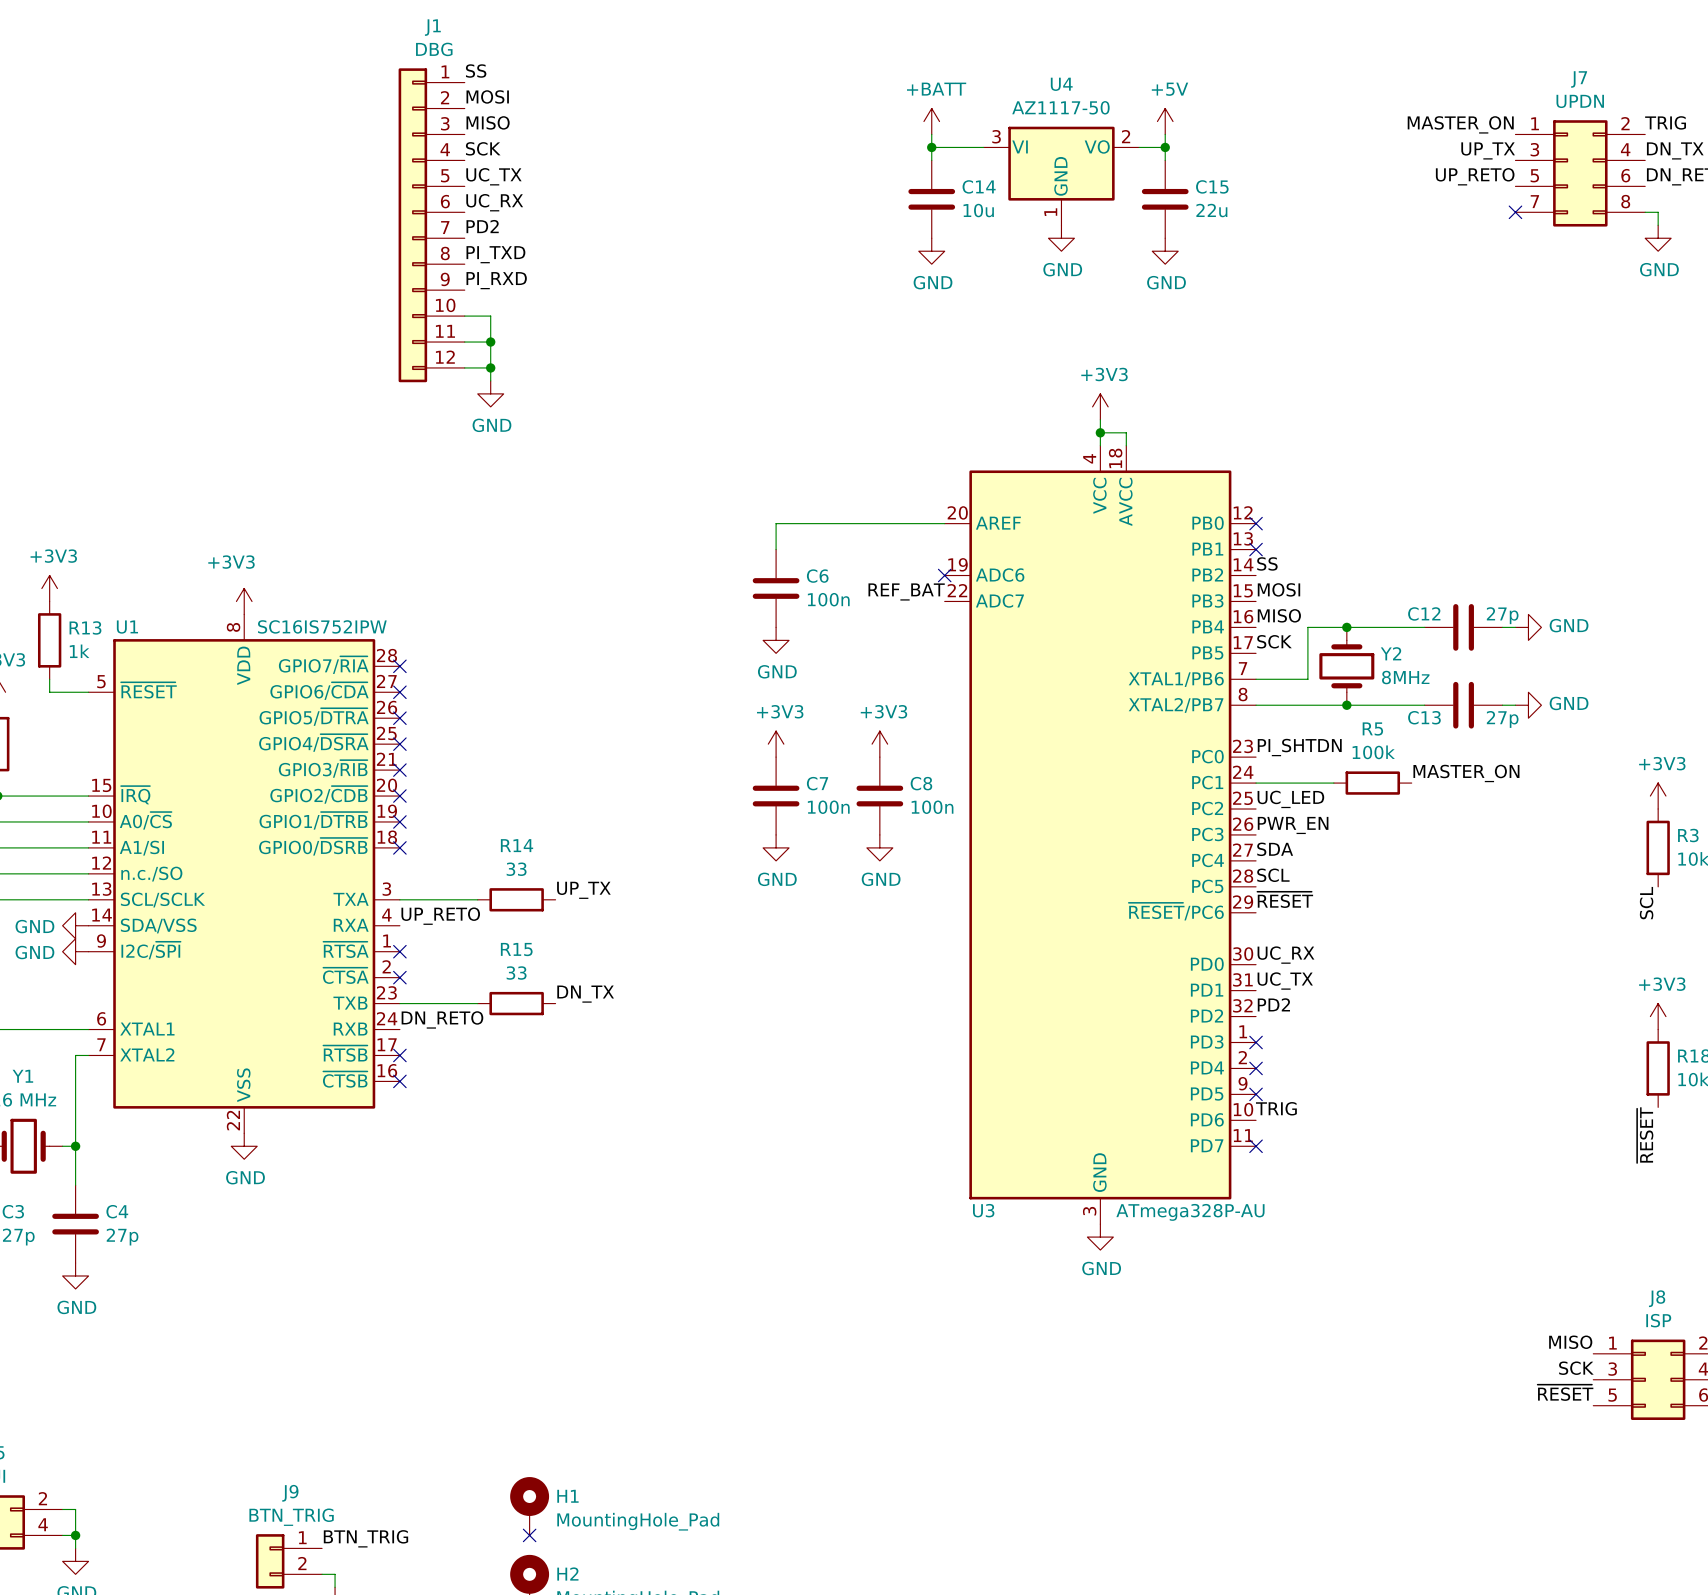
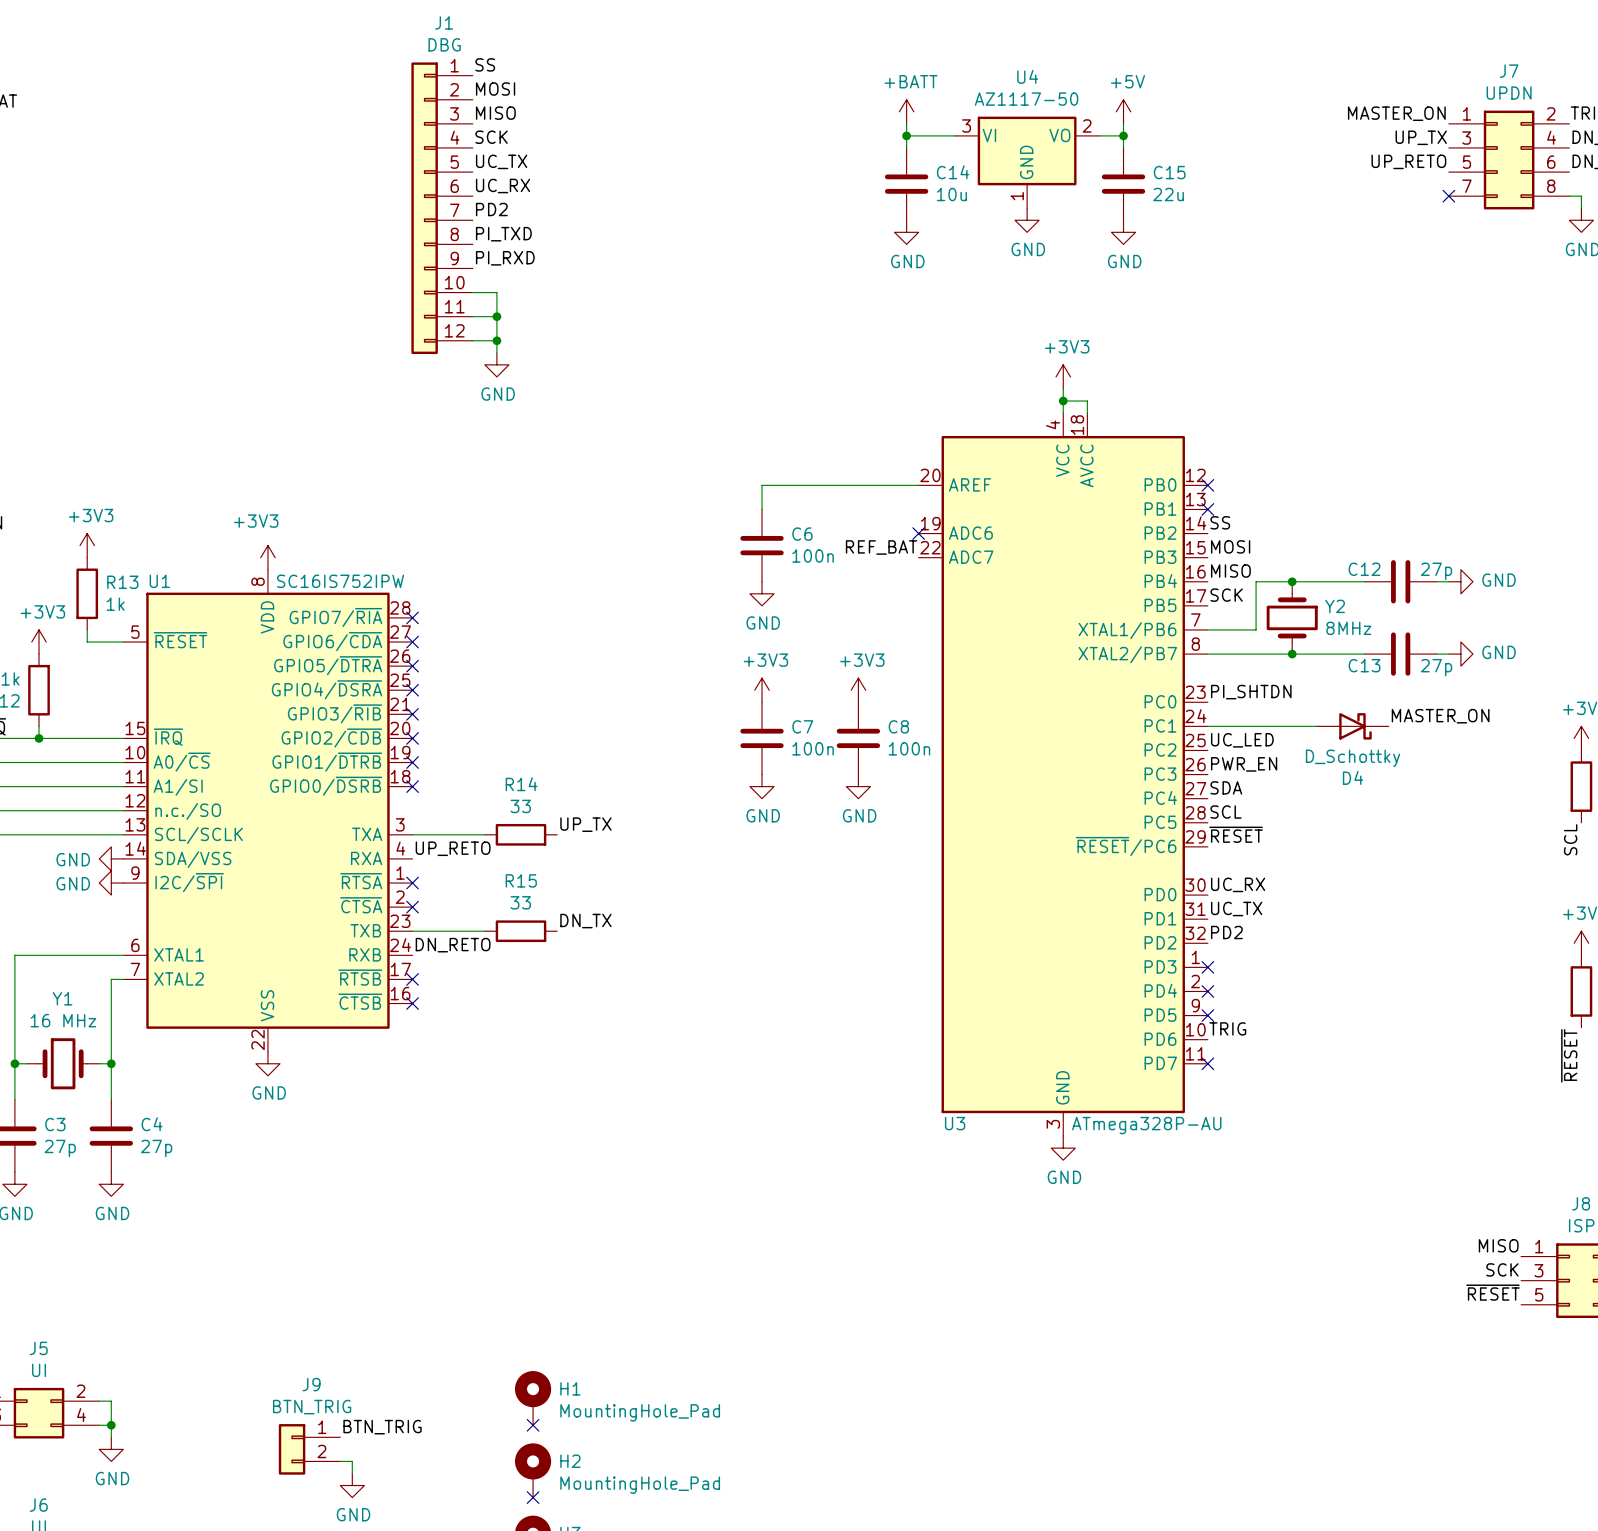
label position: MASTER_ON (1466, 773) -> MASTER_ON (1440, 716)
wire: none -> (1280, 726) (1316, 726)
R5: 100k (1372, 783) -> none
D4: none -> D_Schottky (1352, 726)

